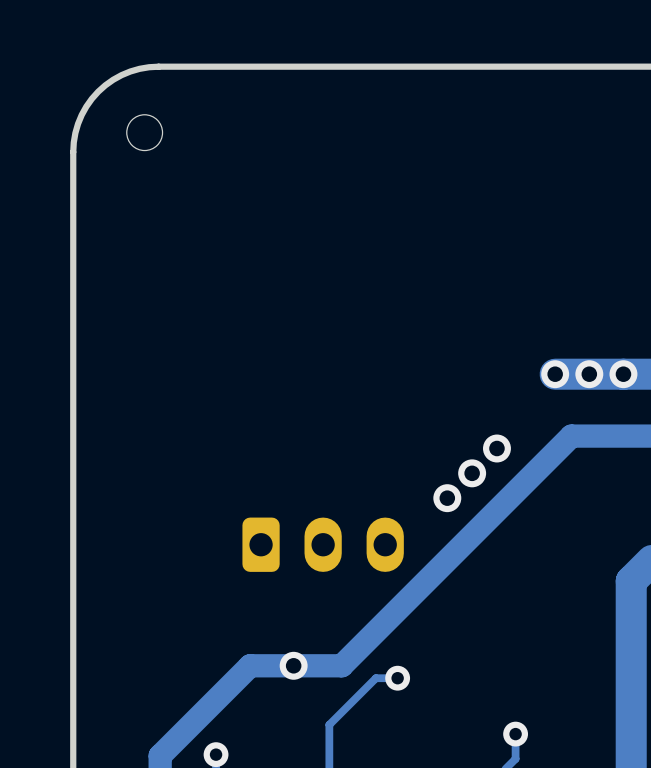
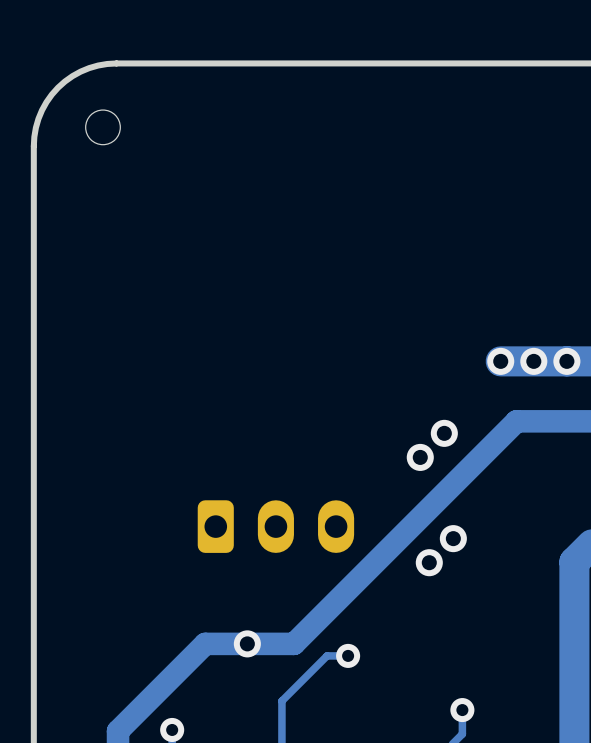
via: (447, 498) -> none
via: none -> (453, 538)
via: none -> (429, 562)

